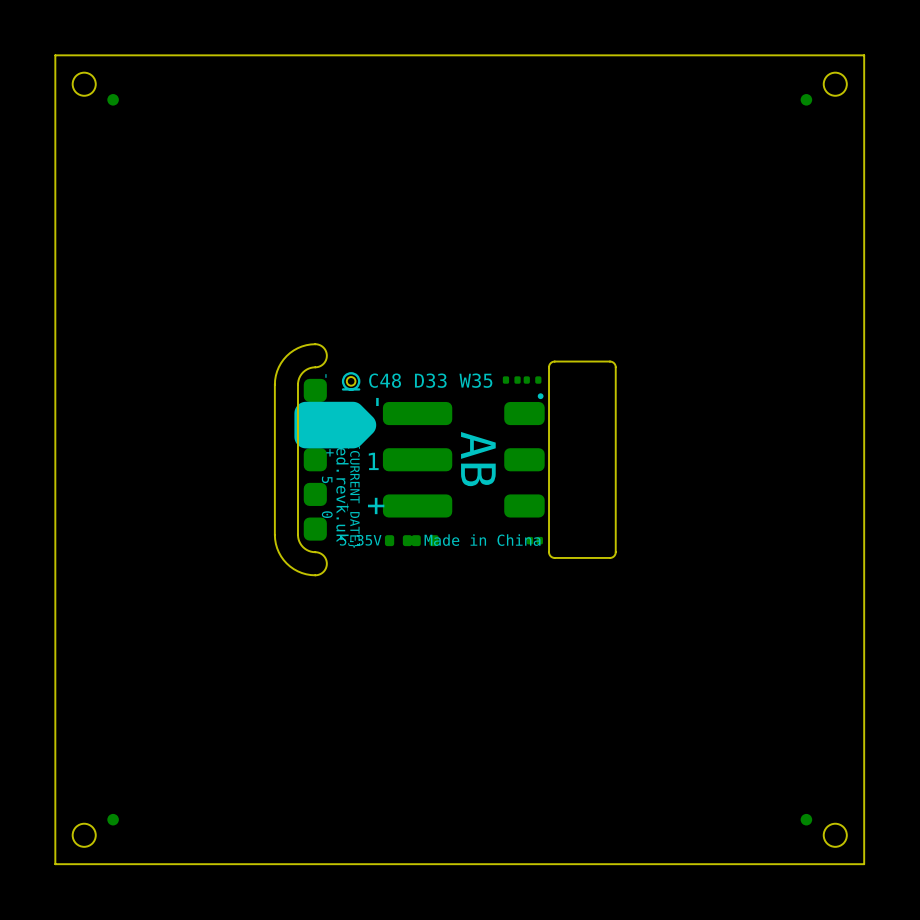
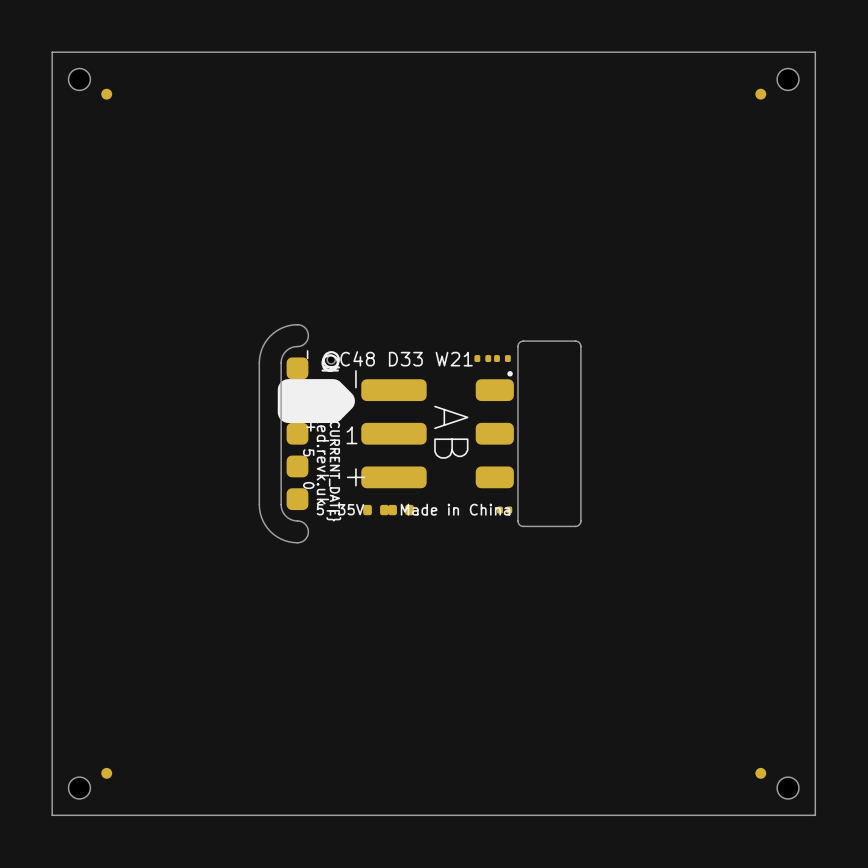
drawing: none -> [321, 354, 339, 372]
text: C48 D33 W35 (430, 380) -> C48 D33 W21 (406, 358)
line: none -> (337, 370) (322, 370)

